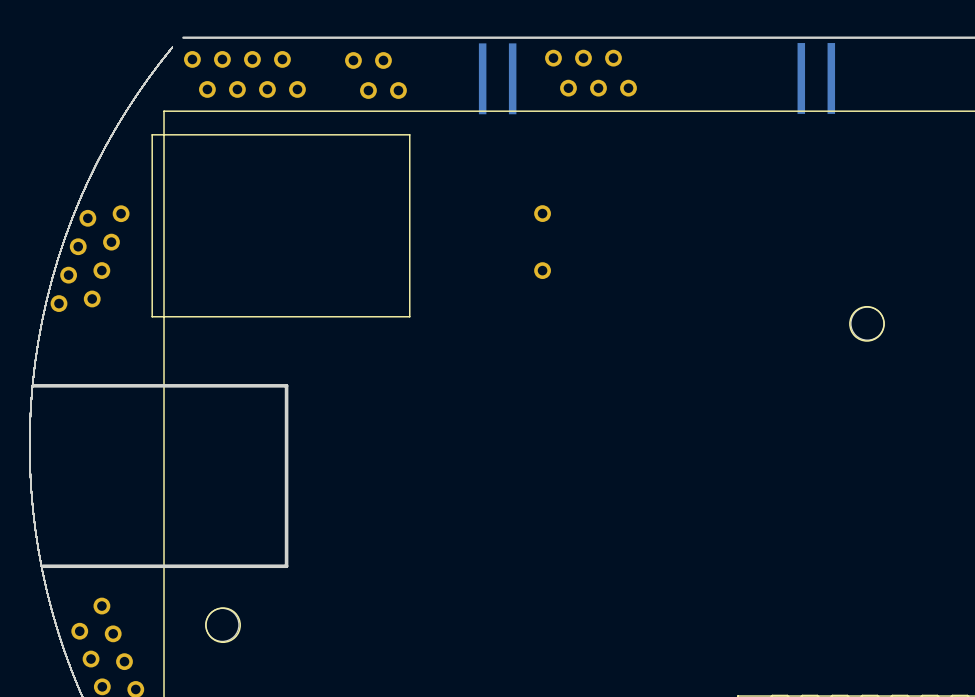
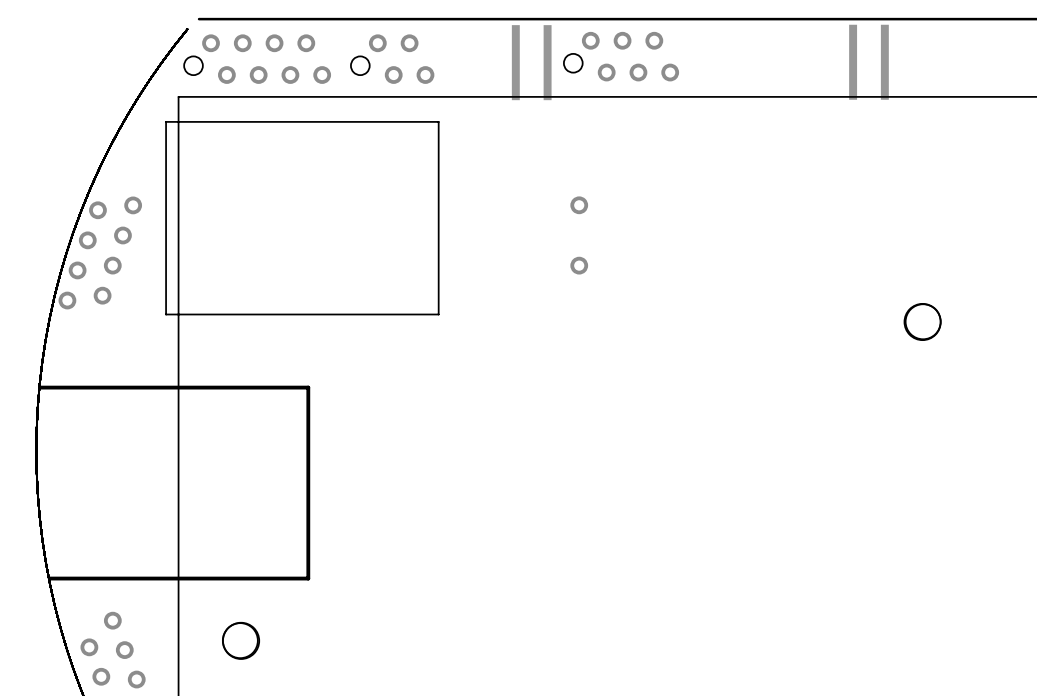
part footprint: [545, 49, 637, 97] -> [563, 31, 680, 82]
part footprint: [184, 51, 306, 98] -> [184, 34, 332, 84]
part footprint: [345, 52, 407, 99] -> [350, 34, 435, 84]

